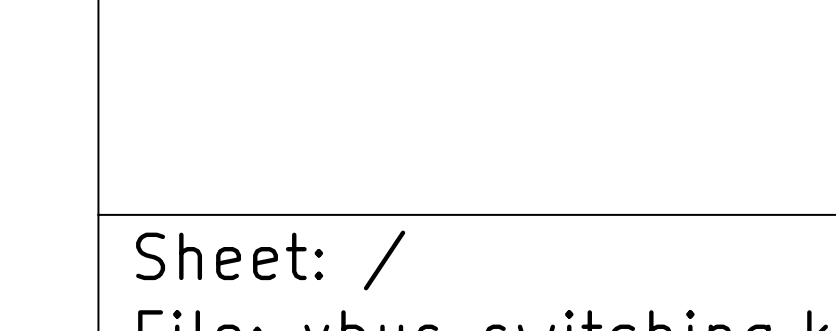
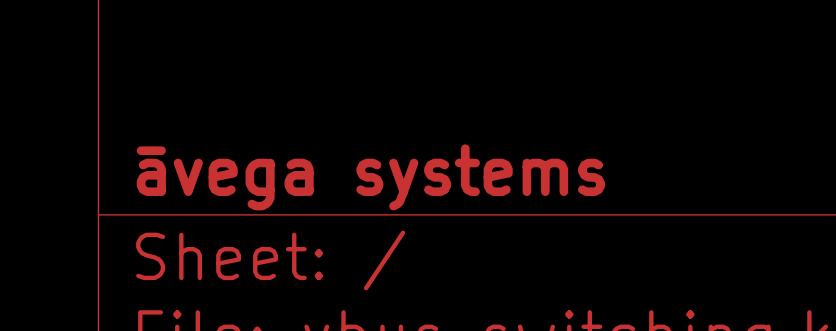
title block: none -> āvega systems (370, 177)

